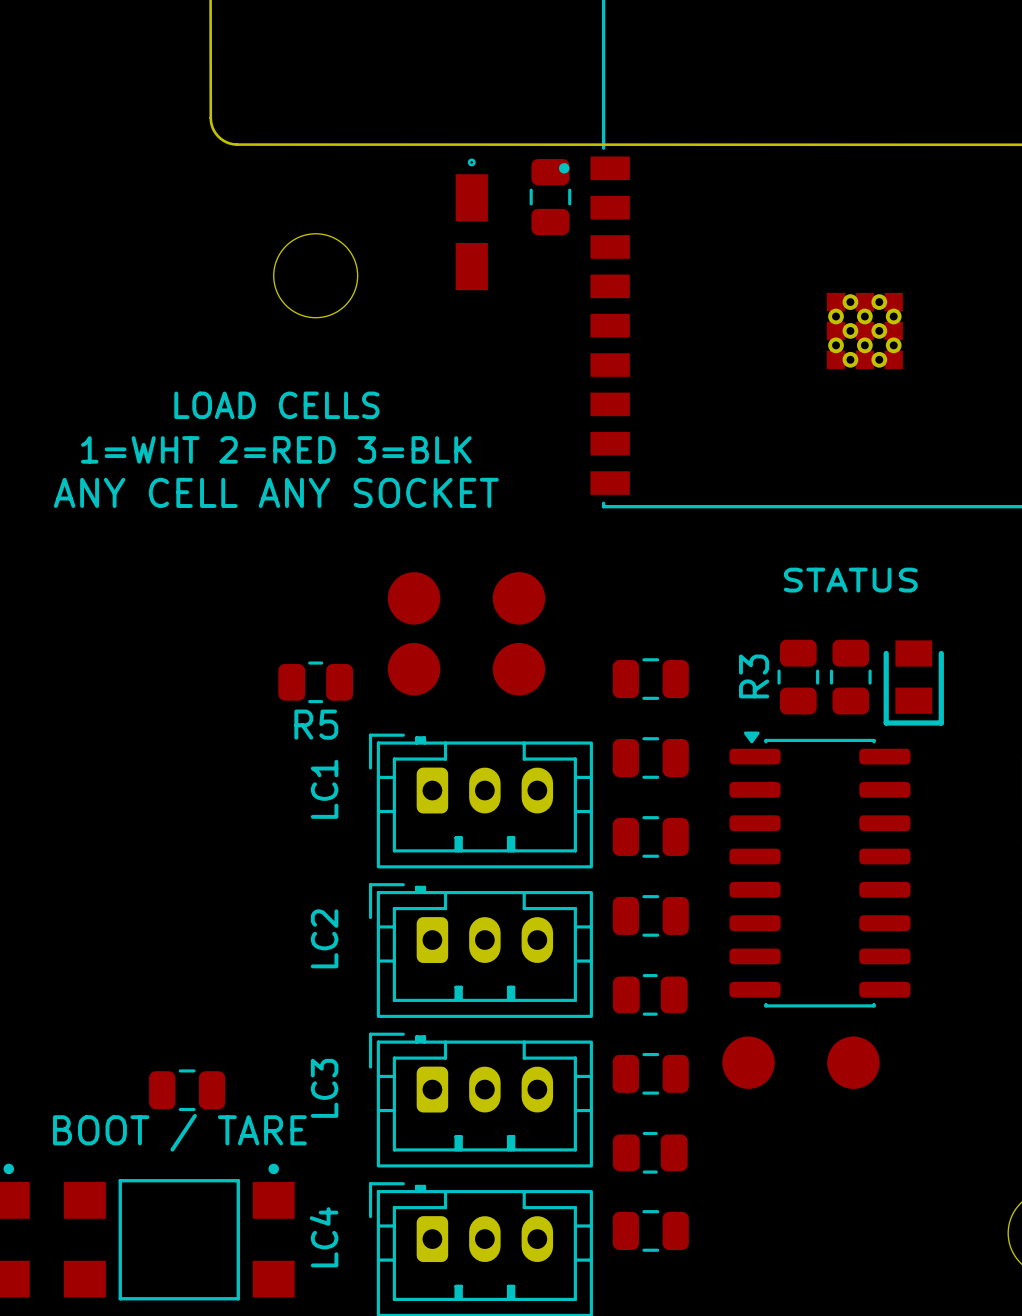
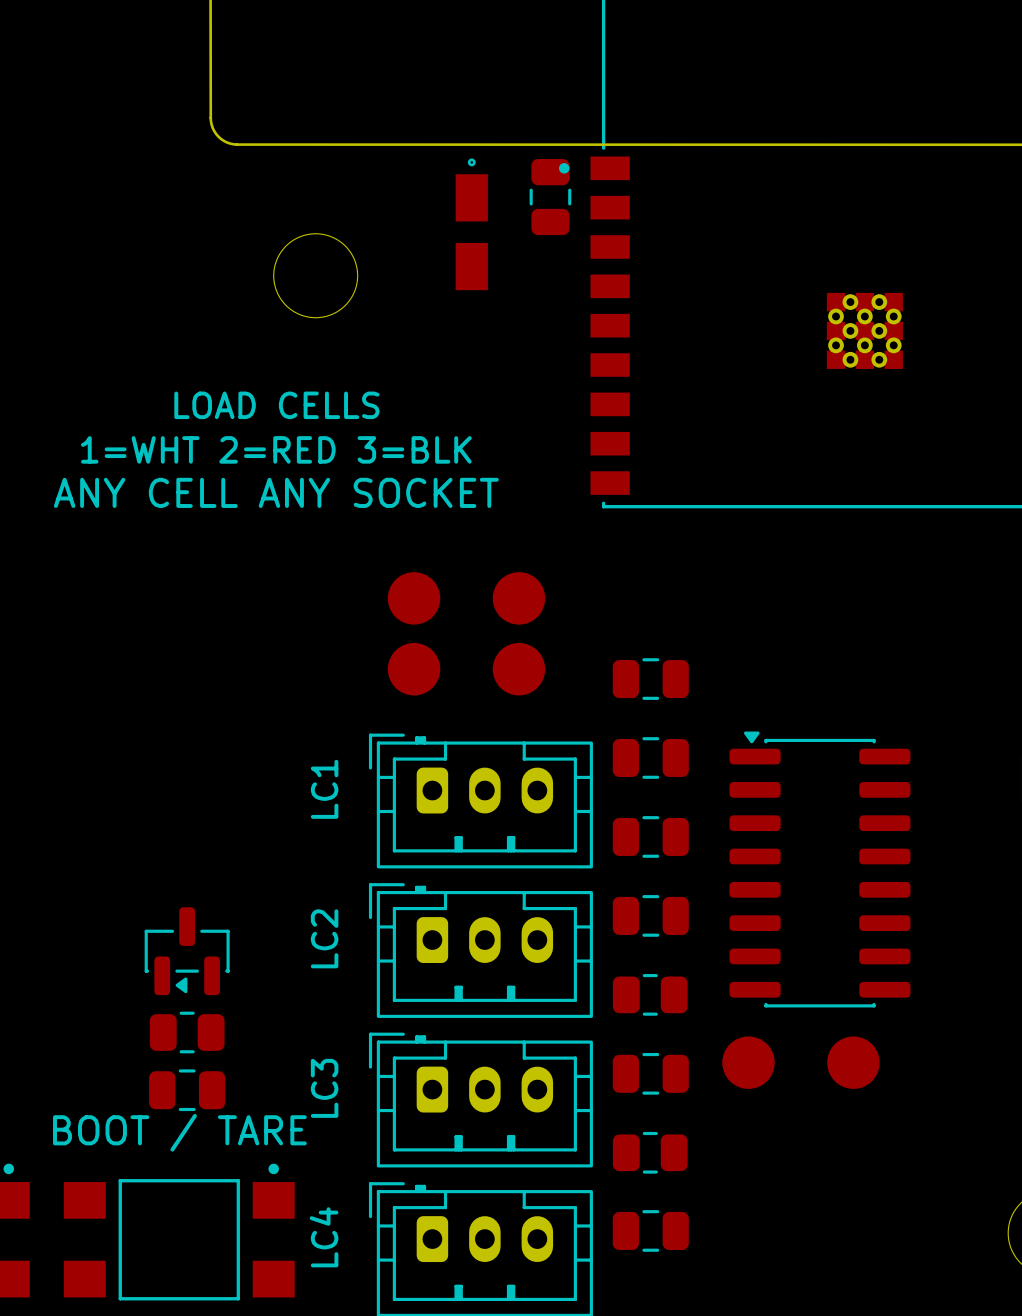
text: STATUS (850, 580) -> none
R3: (798, 677) -> none
part: (850, 677) -> none
R5: (315, 682) -> none
part: (913, 682) -> none
part: none -> (187, 951)
part: none -> (187, 1032)

